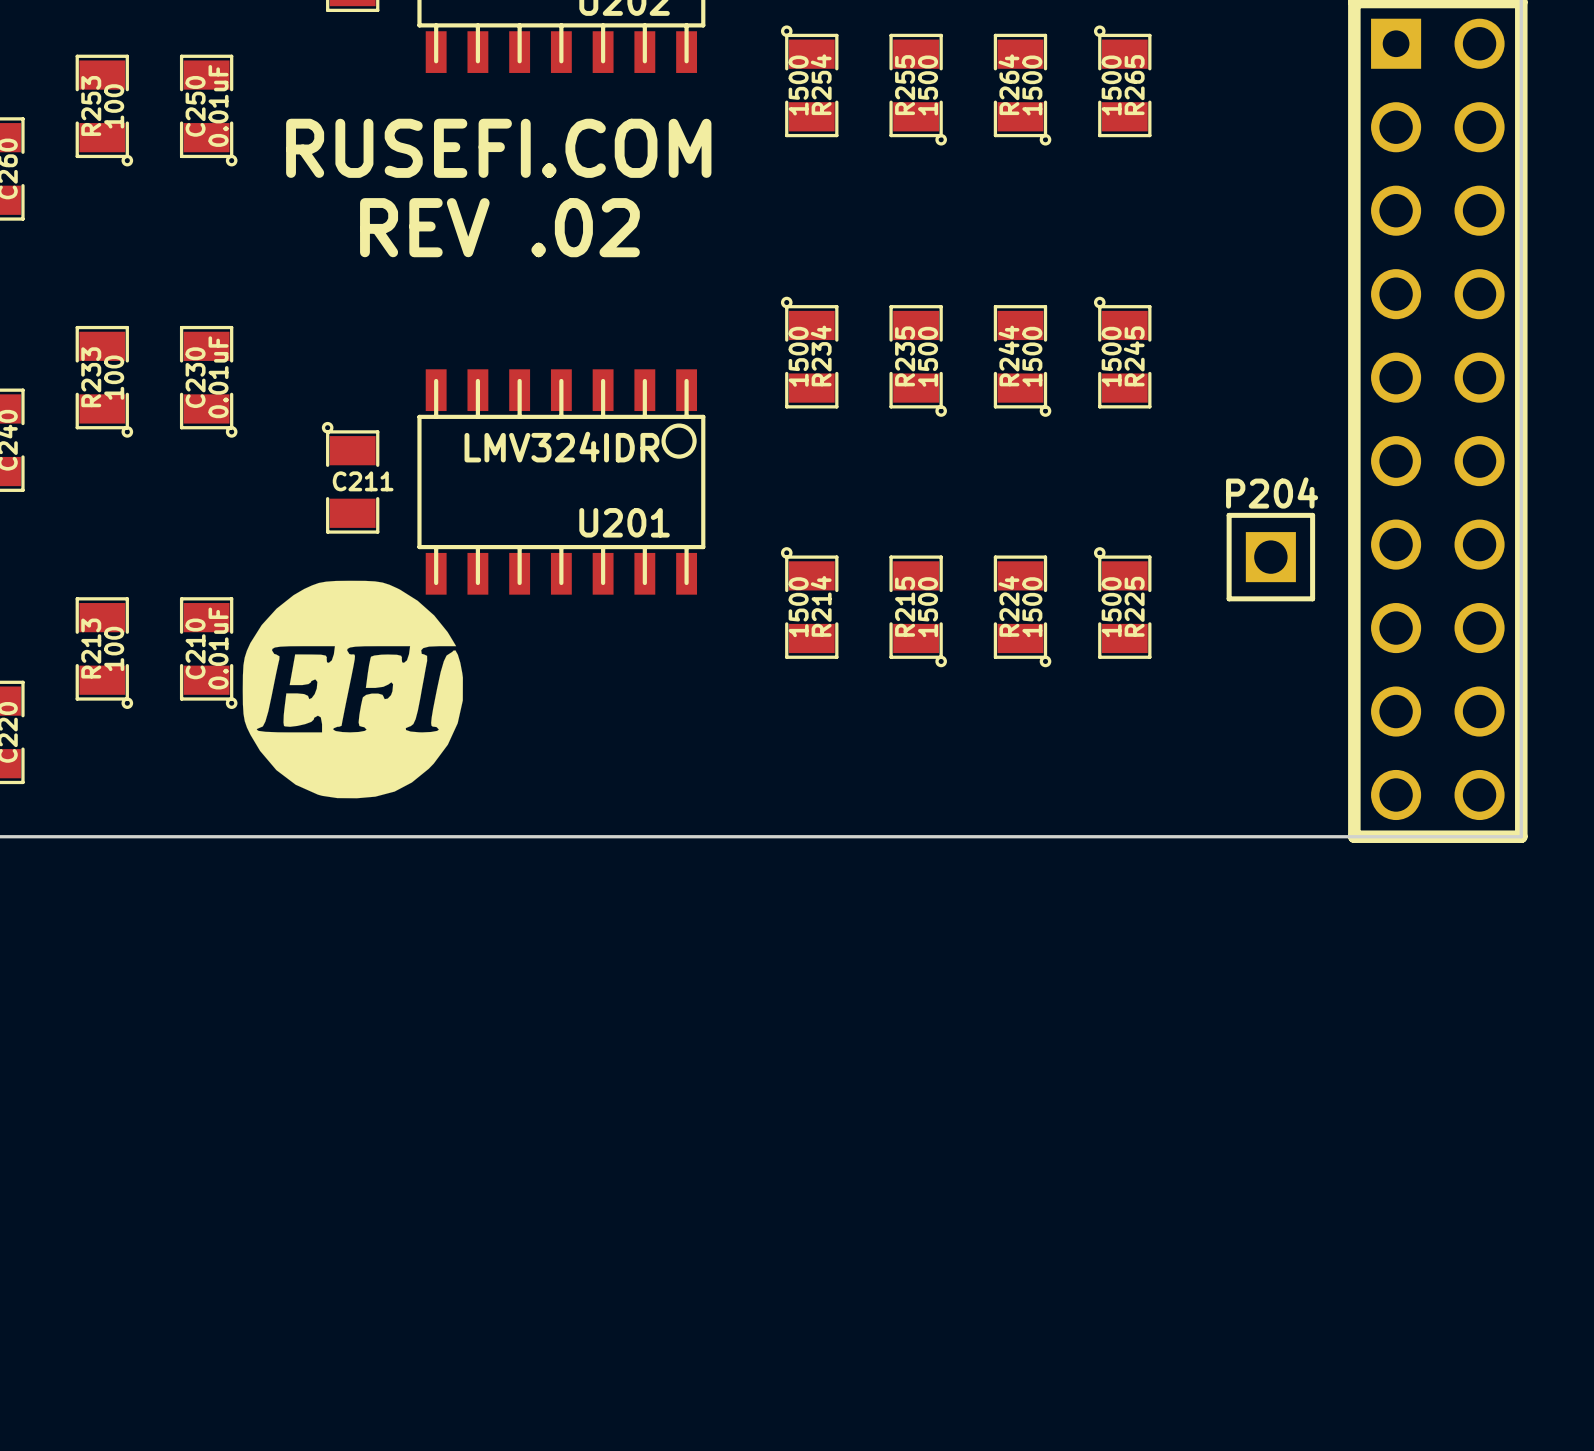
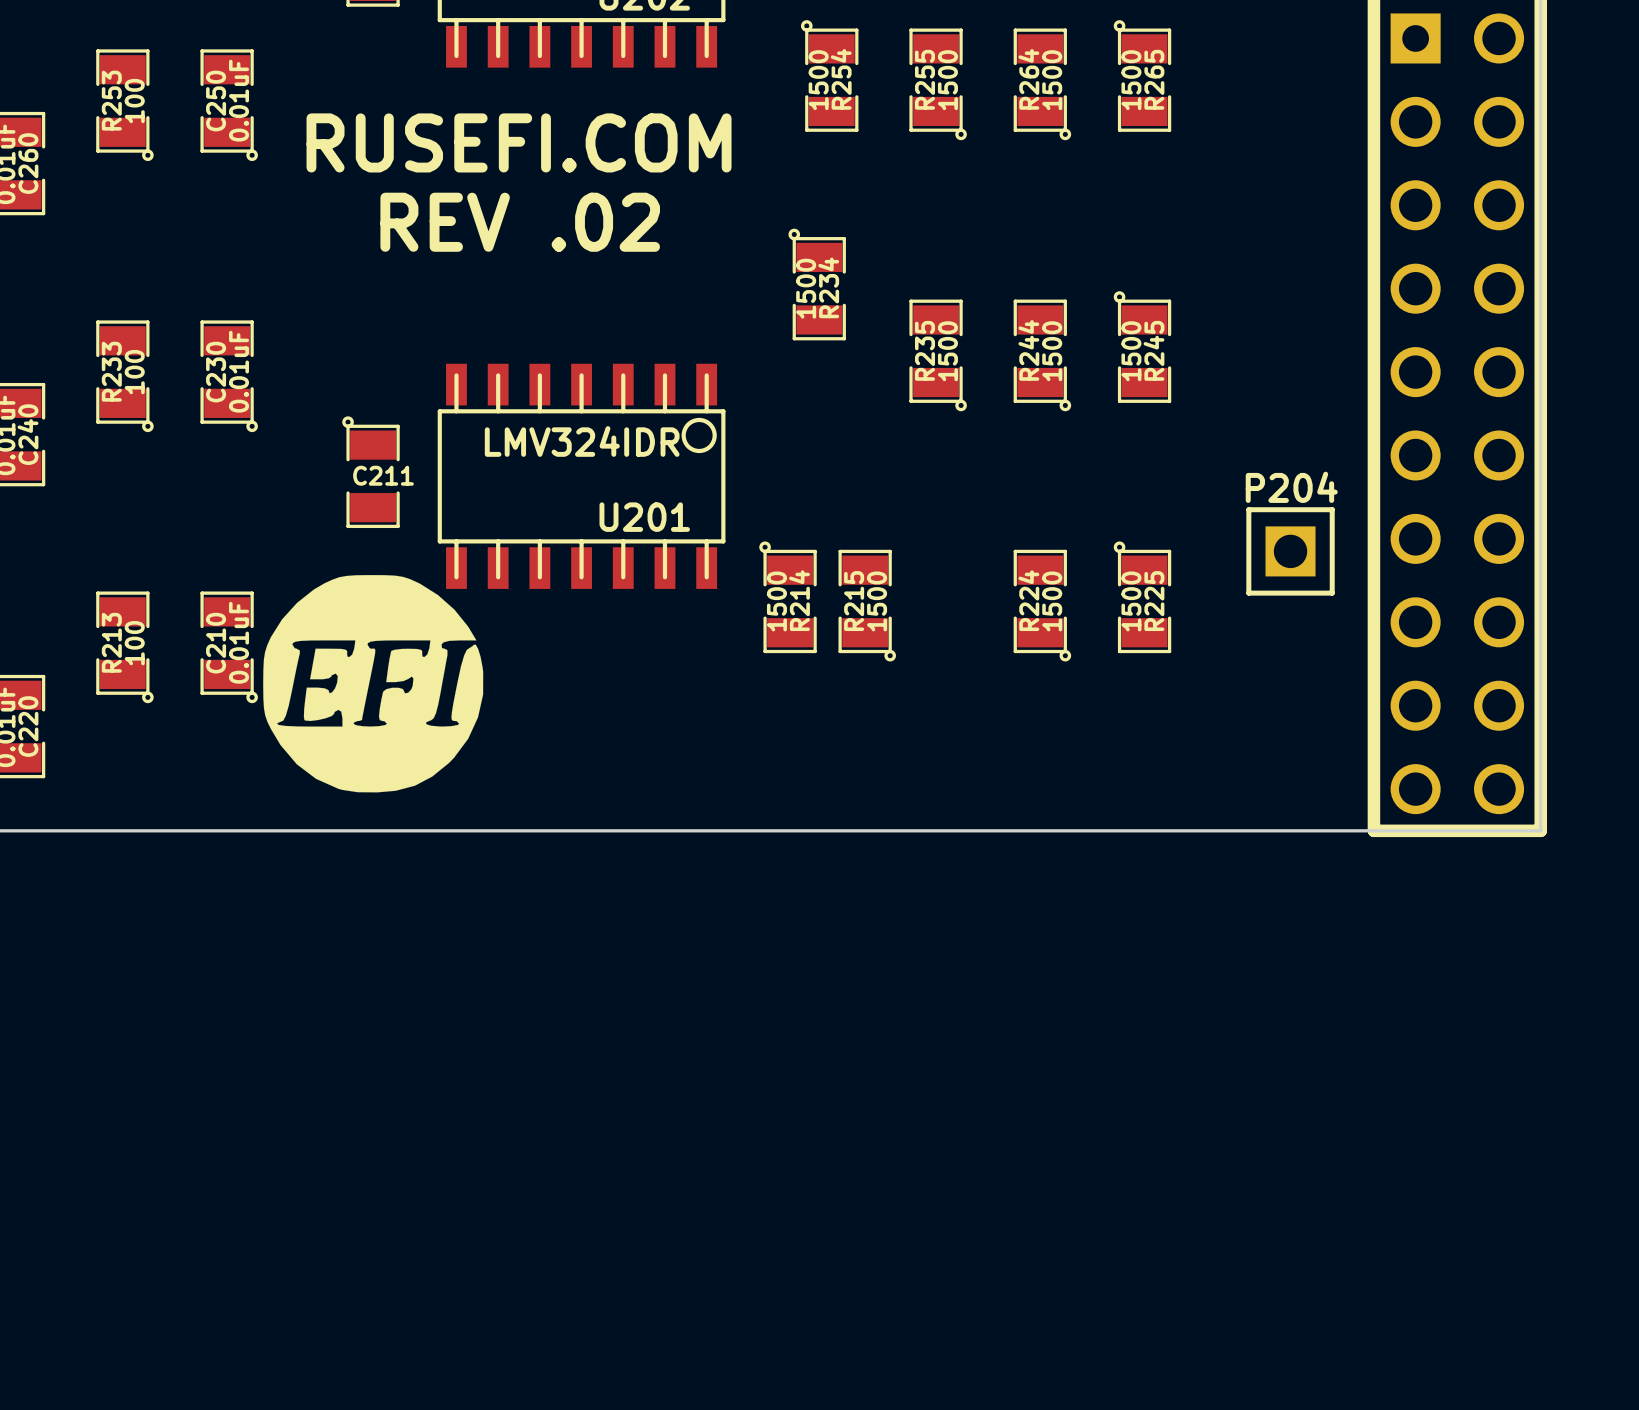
R234 position: (809, 352) -> (817, 284)
R214 position: (809, 603) -> (788, 597)
R215 position: (918, 611) -> (867, 605)

